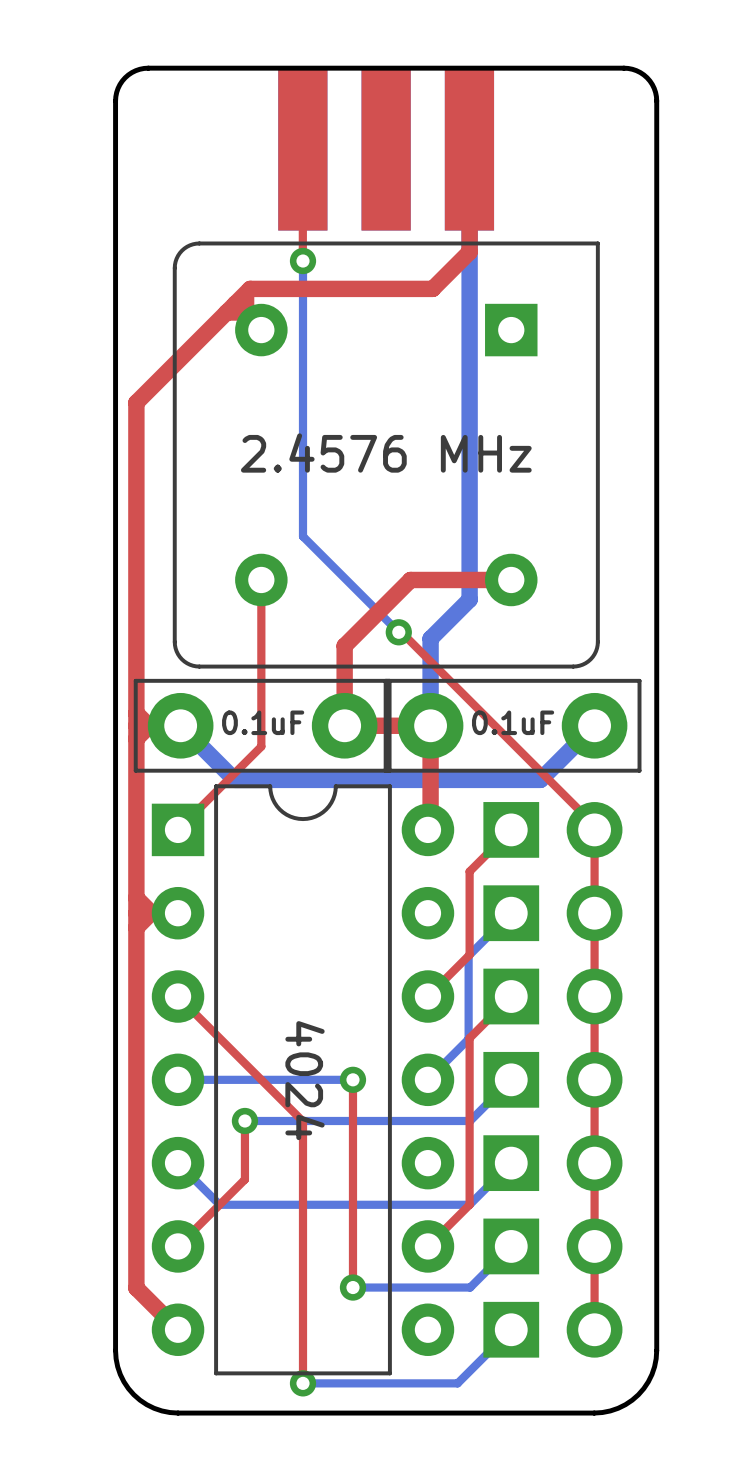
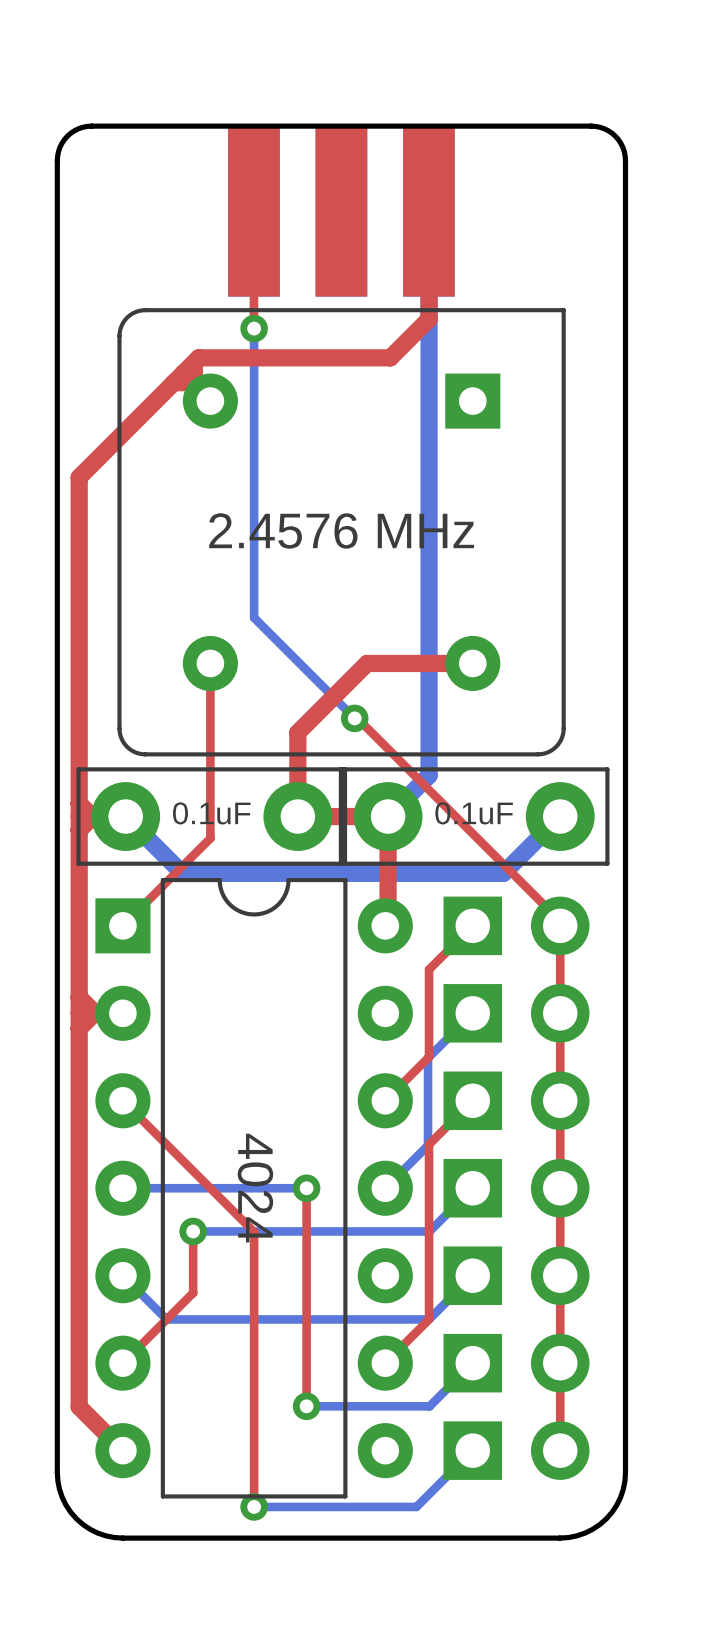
bottom track: (469, 599) (430, 638) (430, 722) -> (429, 684) (429, 775) (391, 813) (388, 813)

